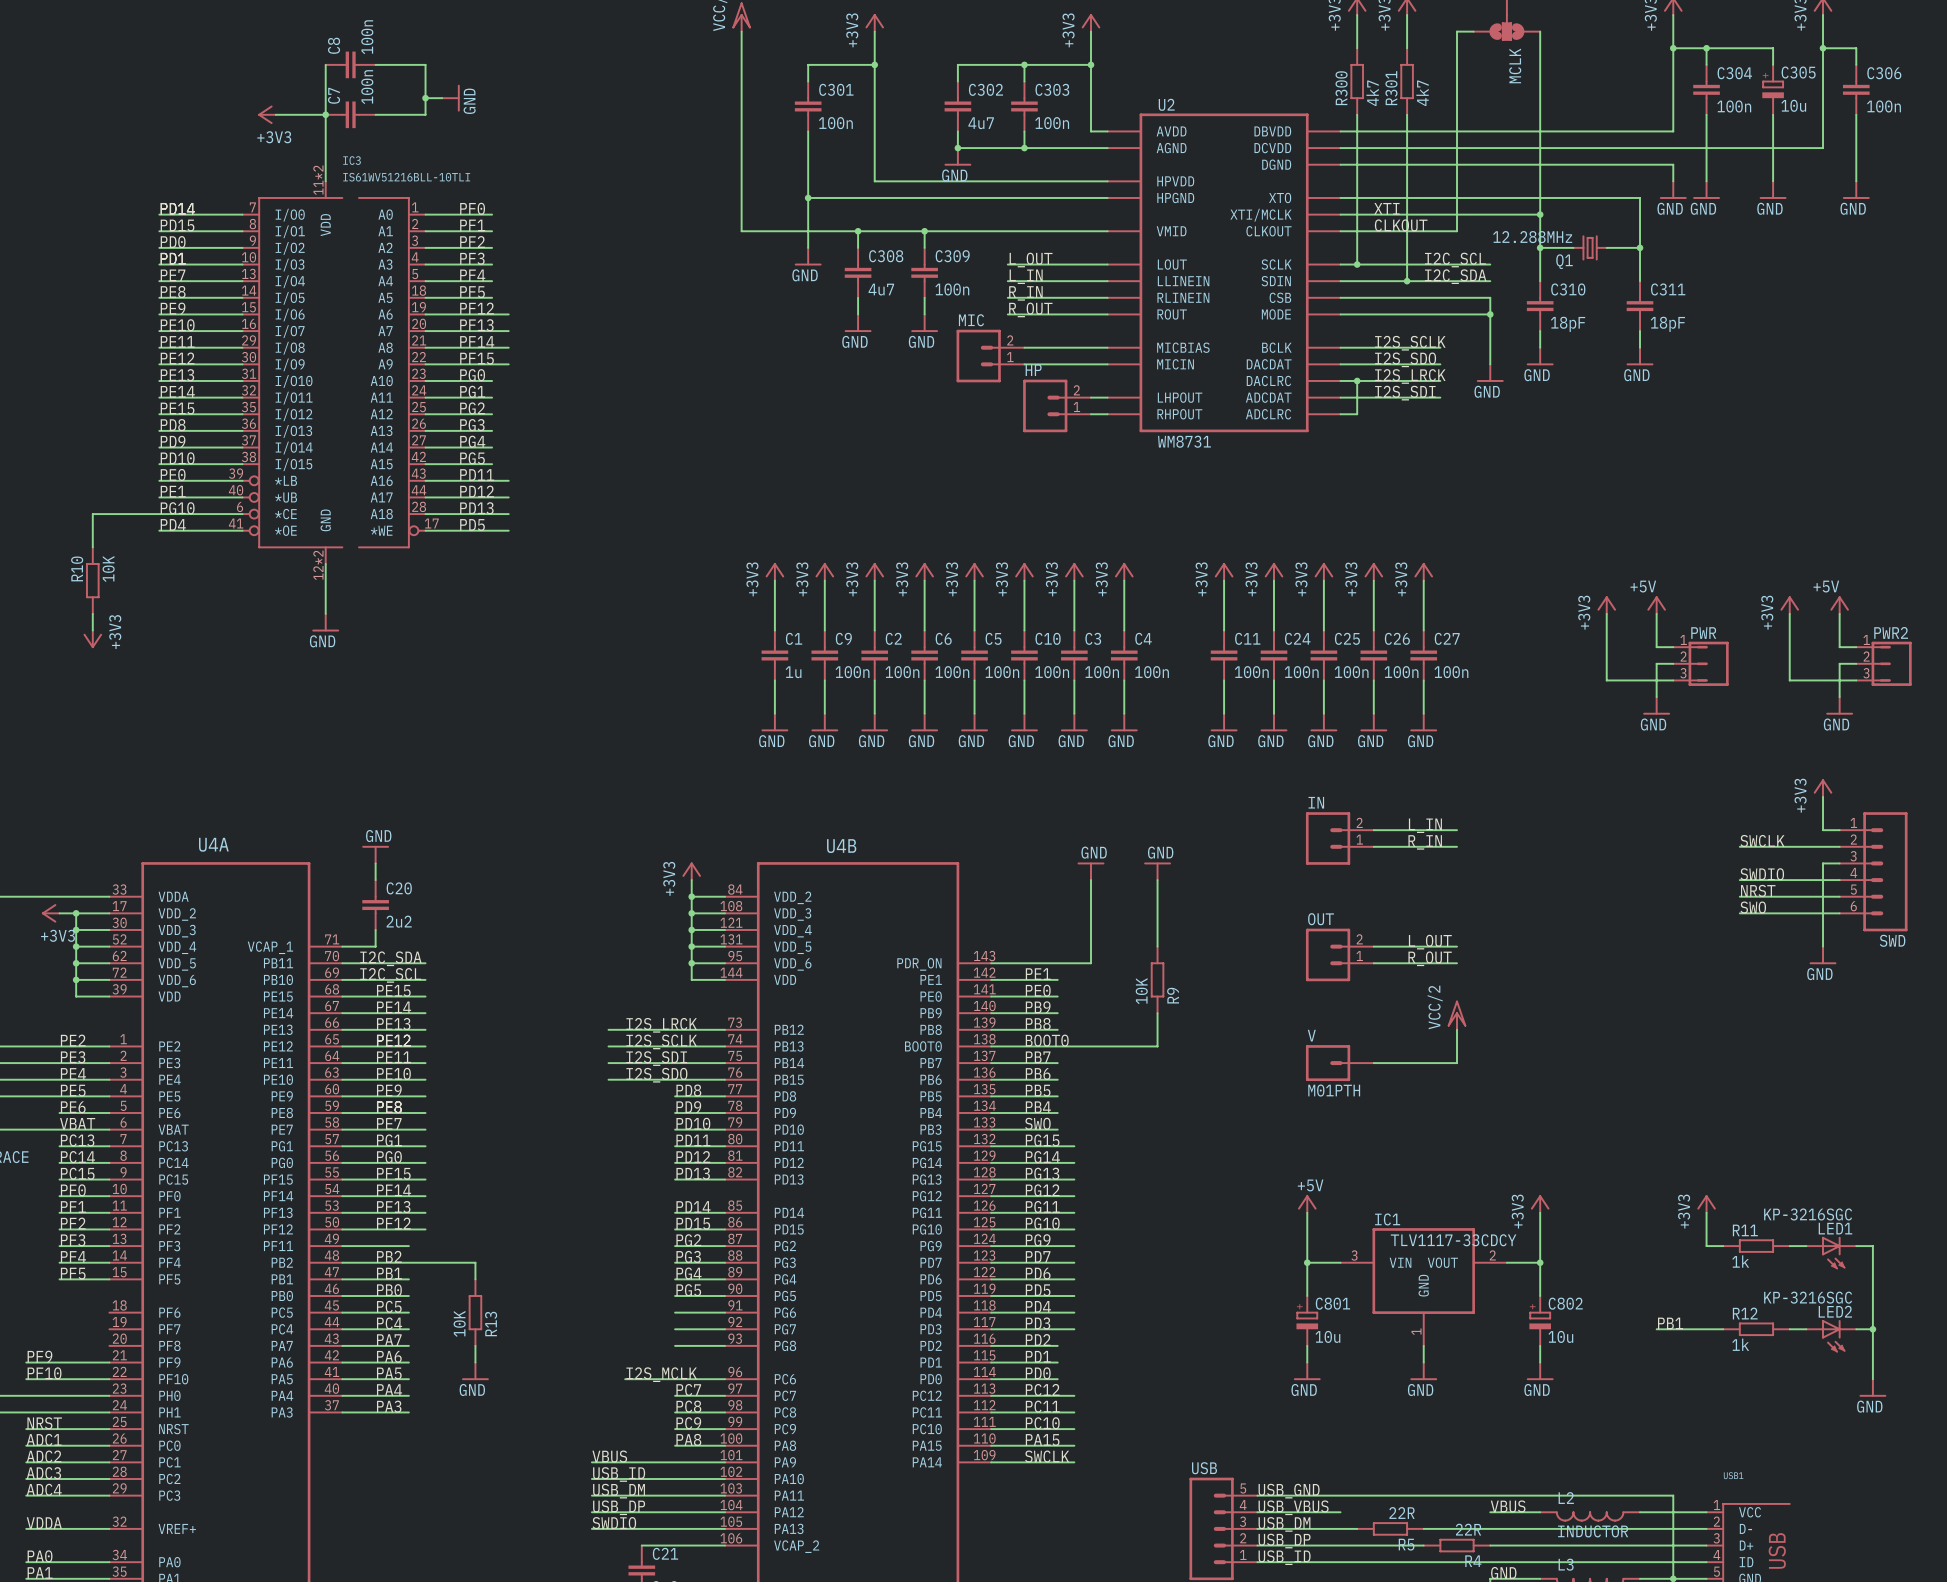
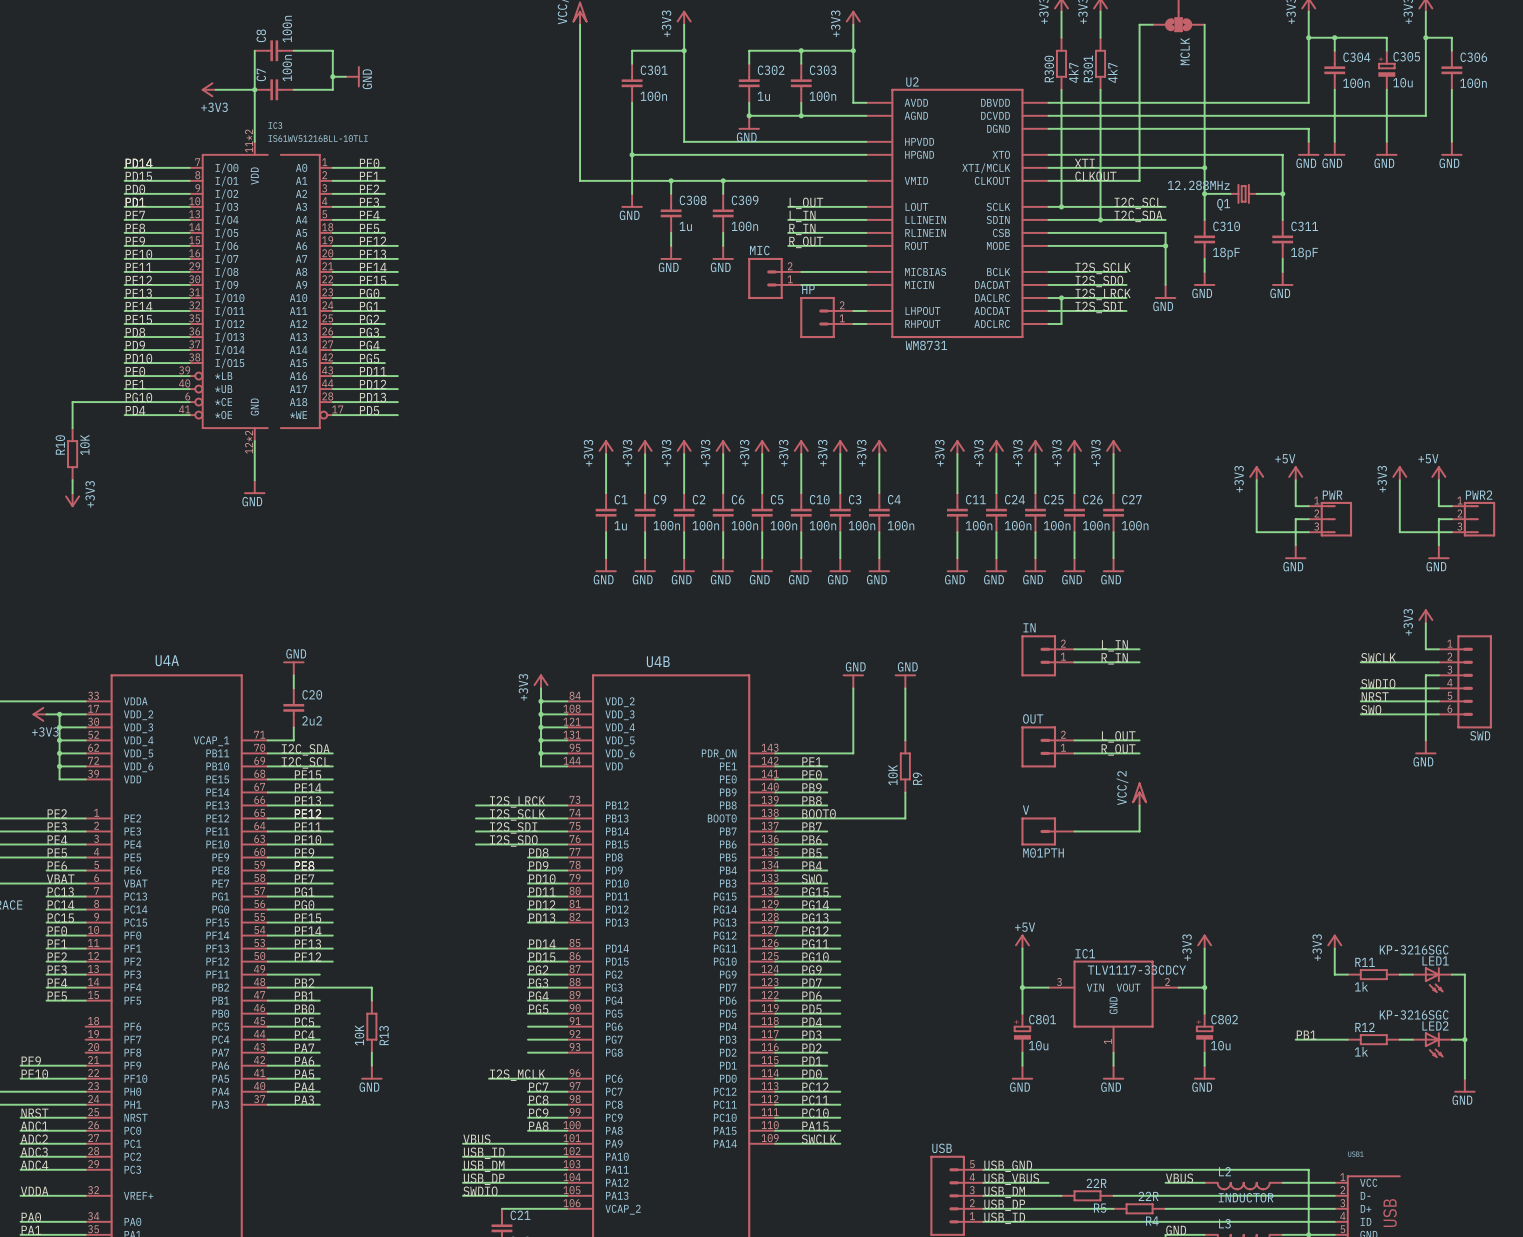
C302 value: 4u7 (981, 123) -> 1u (763, 96)
C308 value: 4u7 (881, 289) -> 1u (685, 226)

